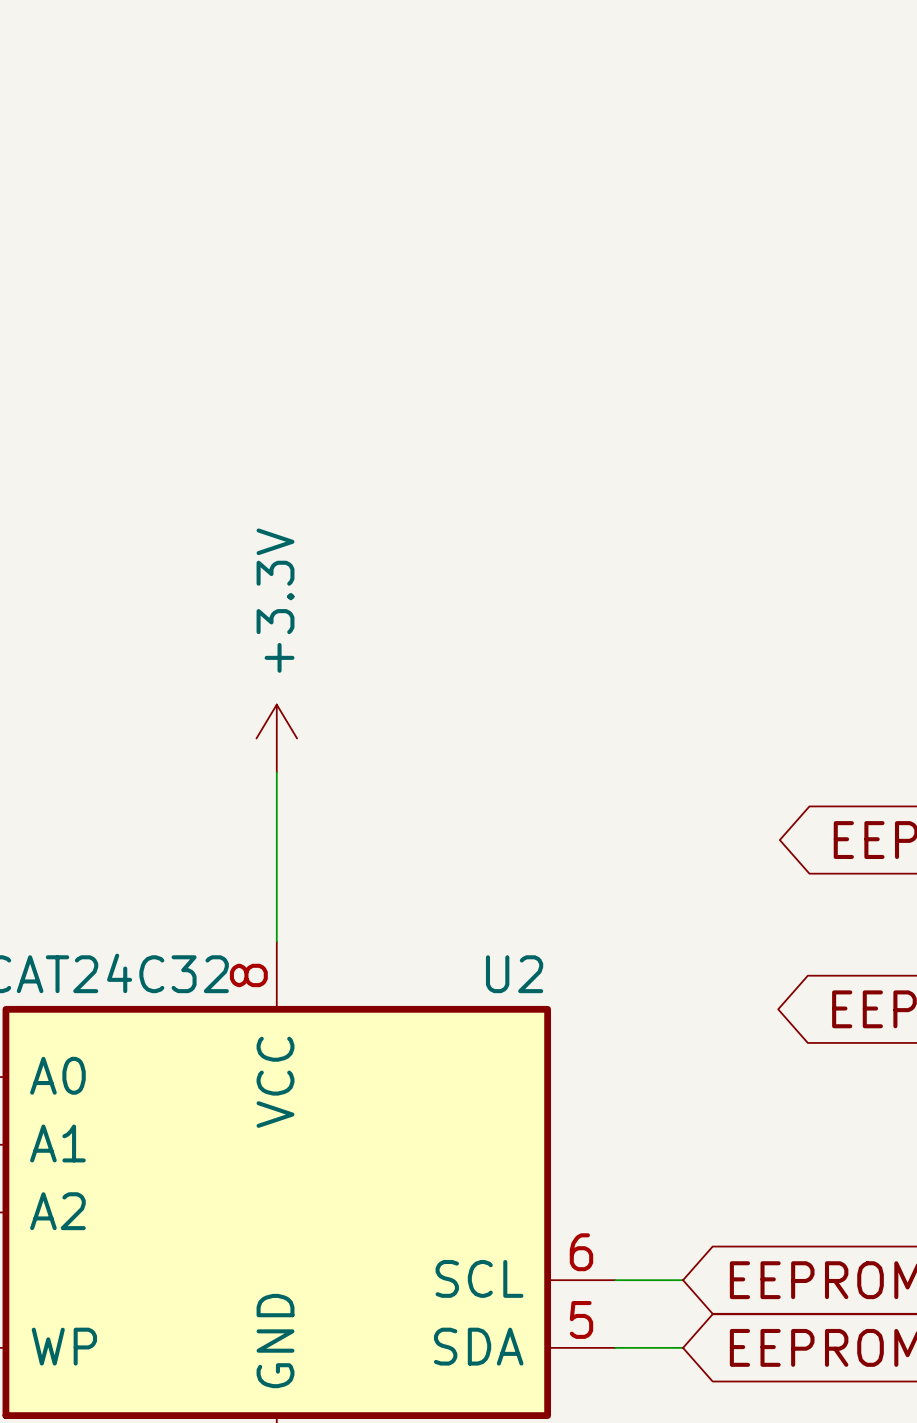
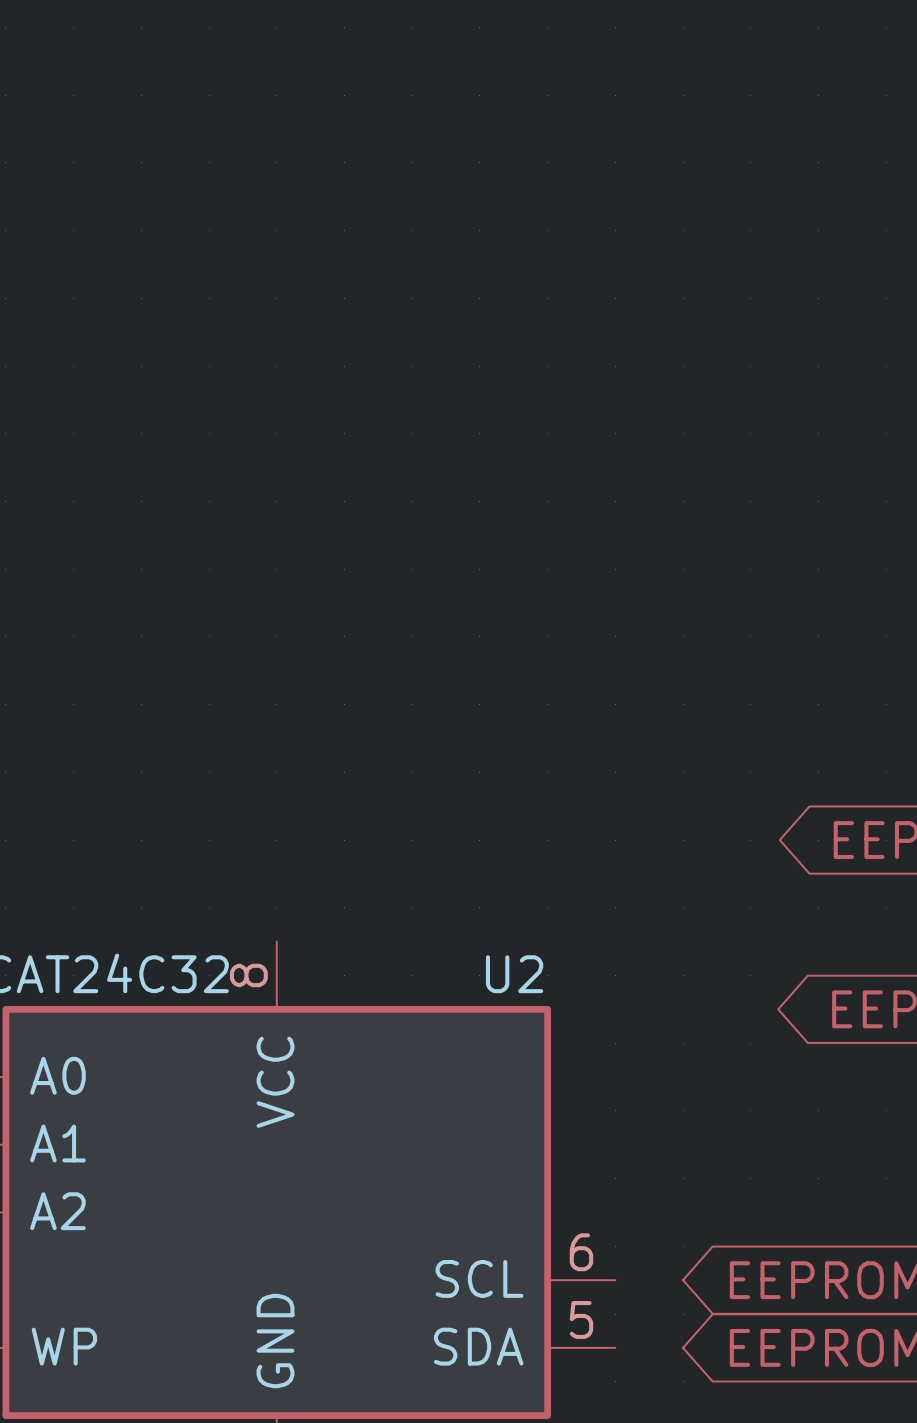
power symbol: +3.3V (276, 738) -> none
wire: (276, 772) (276, 941) -> none
wire: (615, 1280) (683, 1280) -> none
wire: (615, 1347) (683, 1347) -> none

